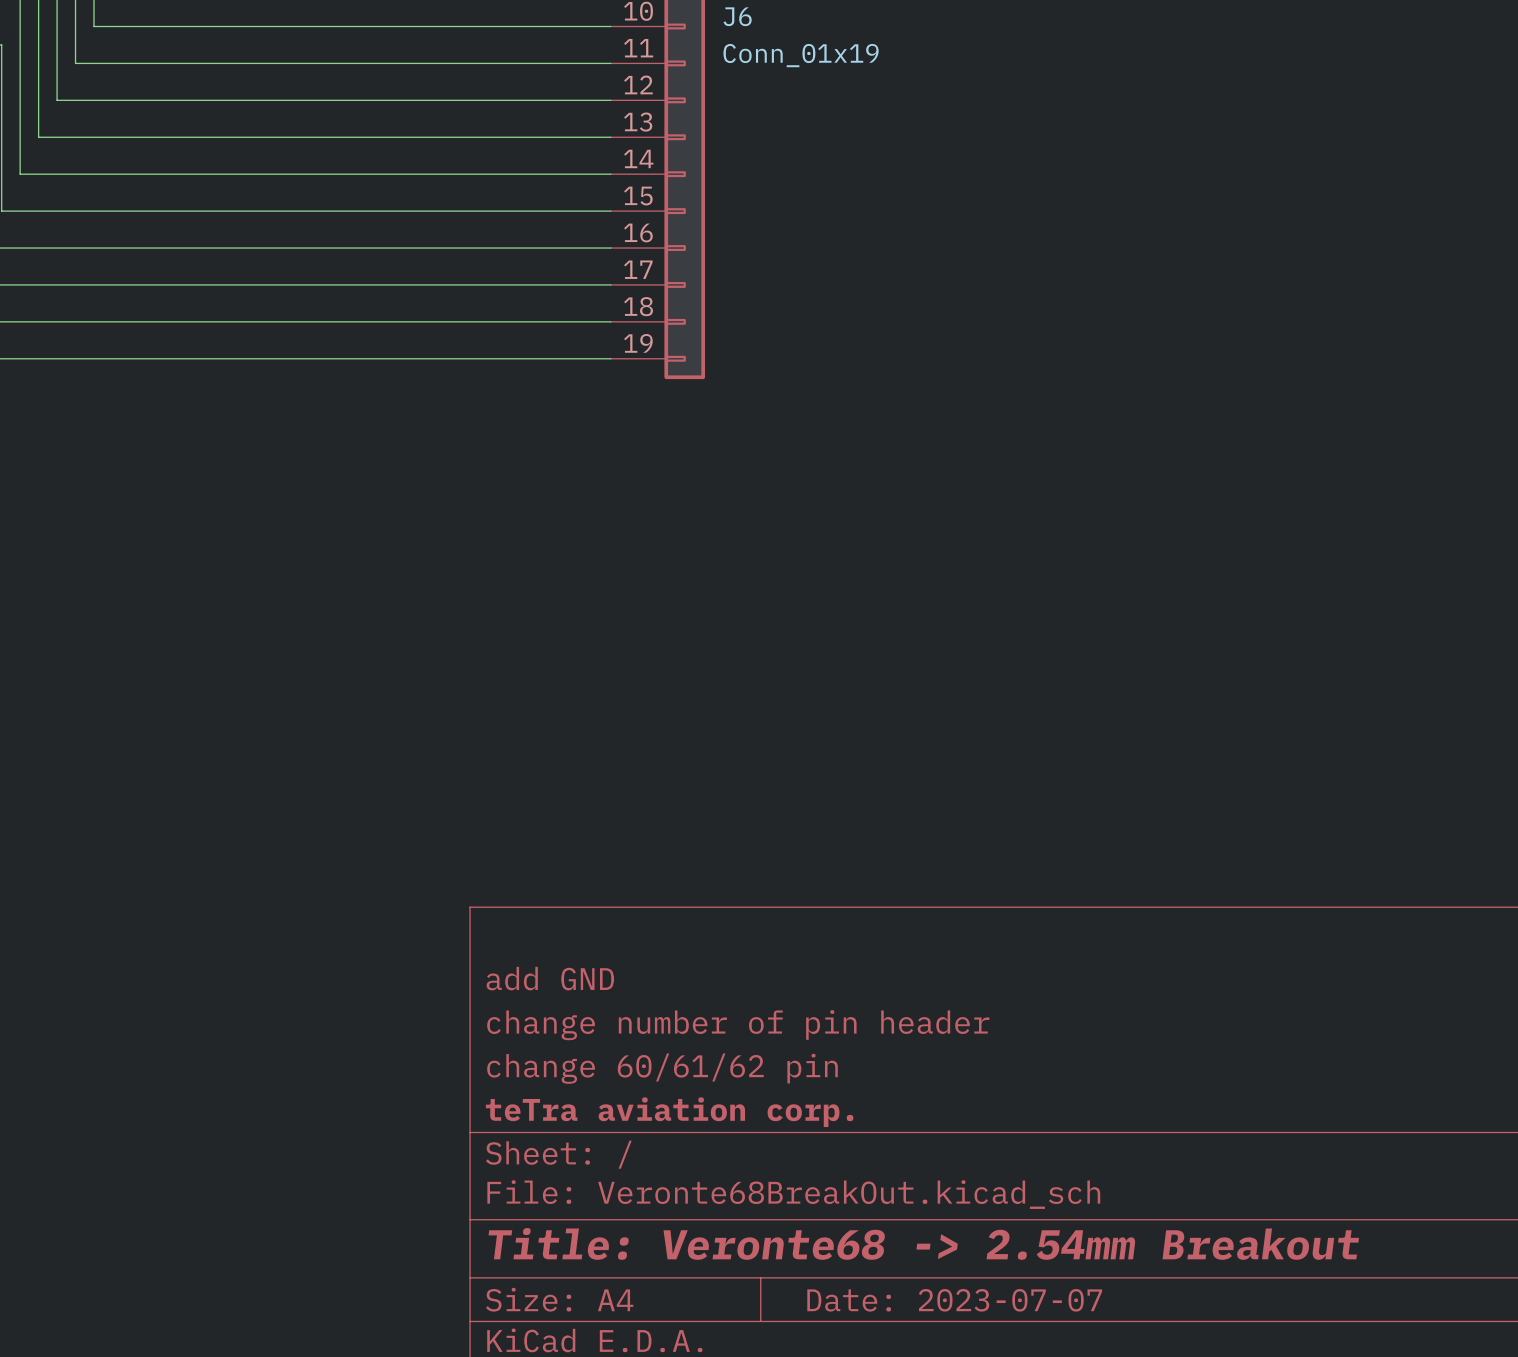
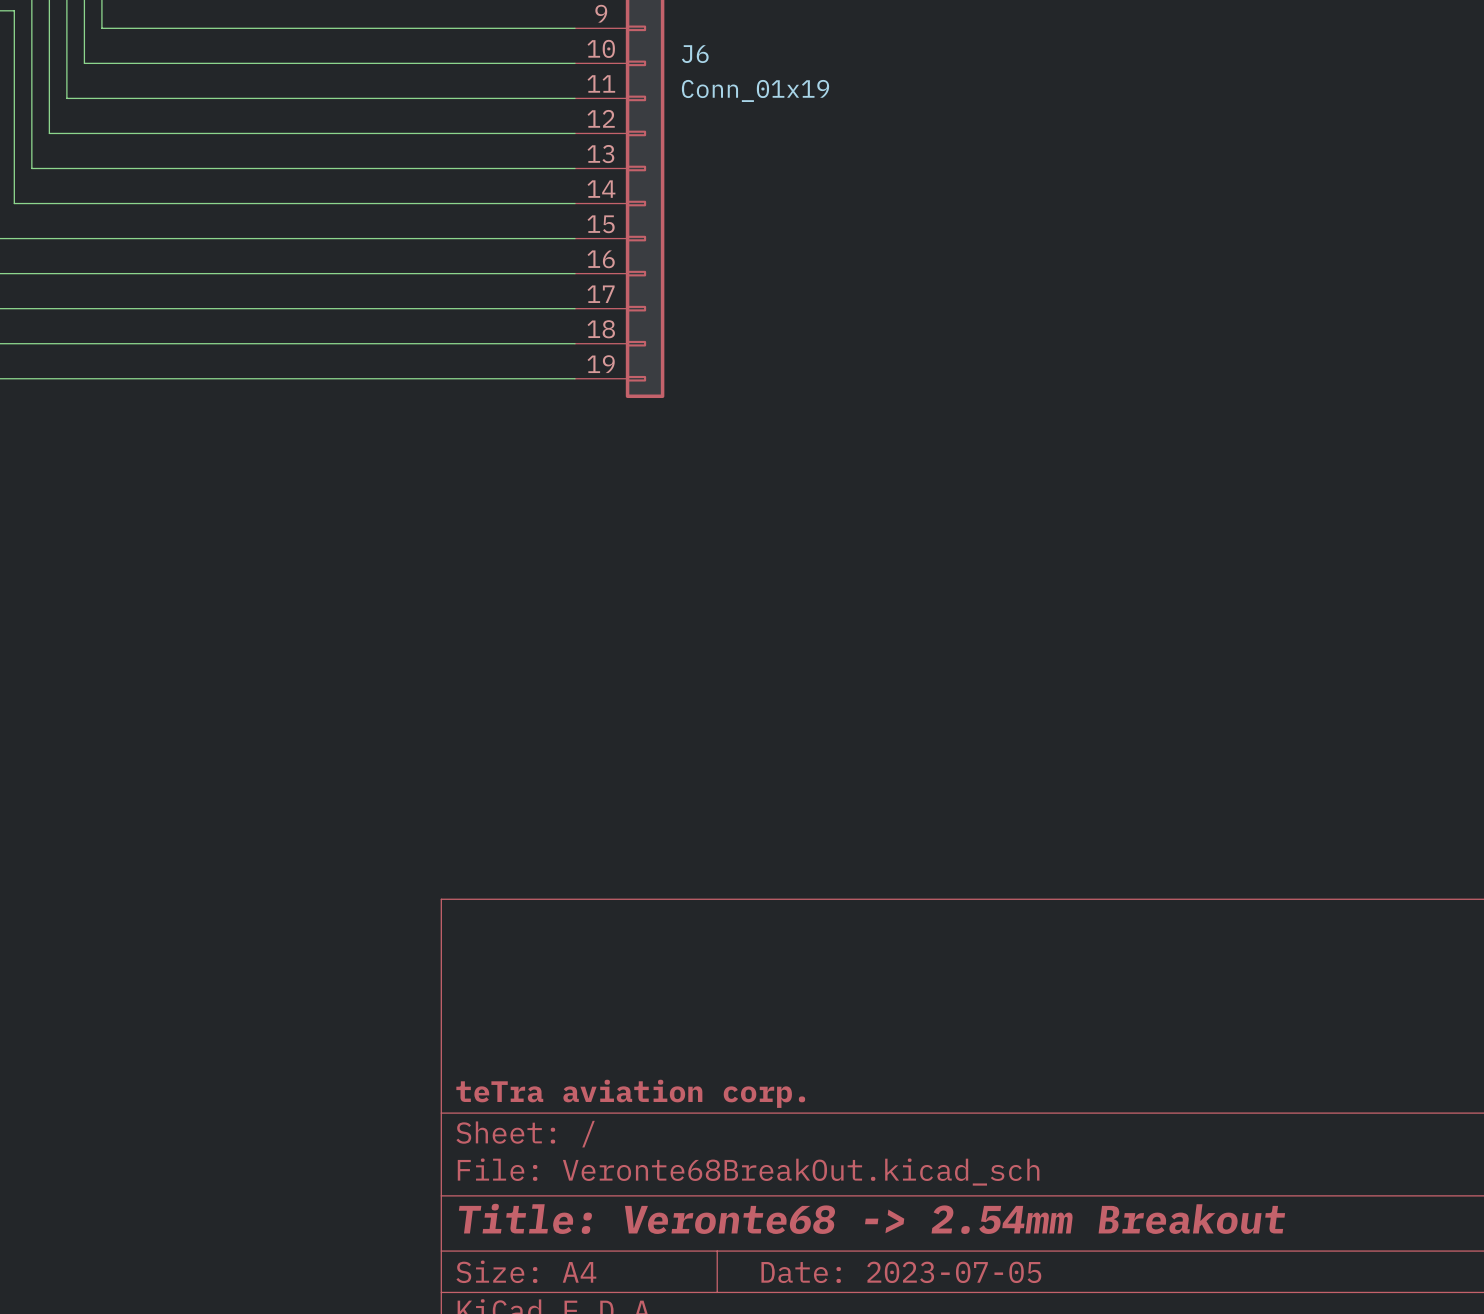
title block: add GND (550, 978) -> none
title block: change number of pin header (738, 1025) -> none
title block: change 60/61/62 pin (662, 1068) -> none
title block: Date: 2023-07-07 (954, 1300) -> Date: 2023-07-05 (901, 1272)

